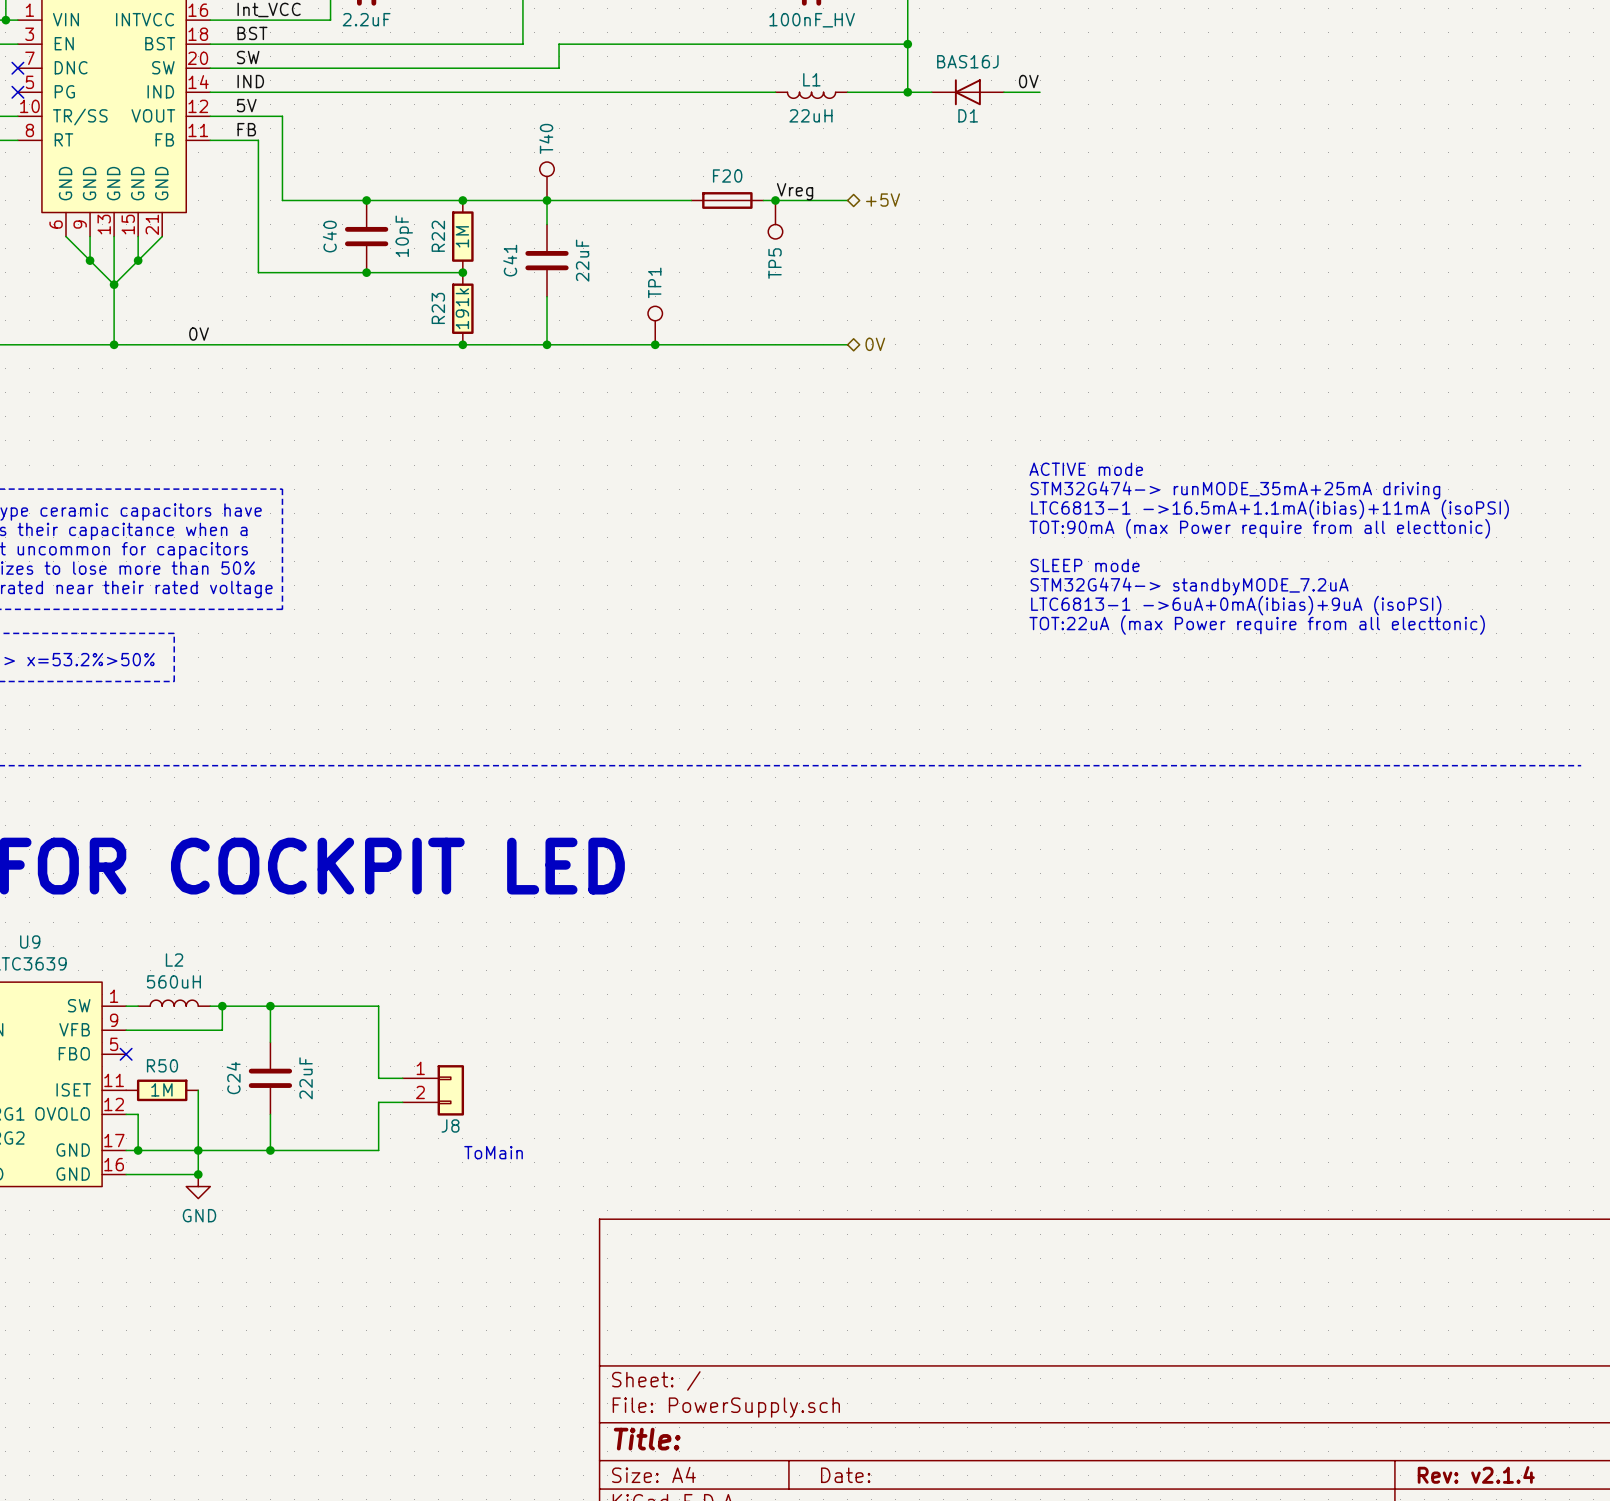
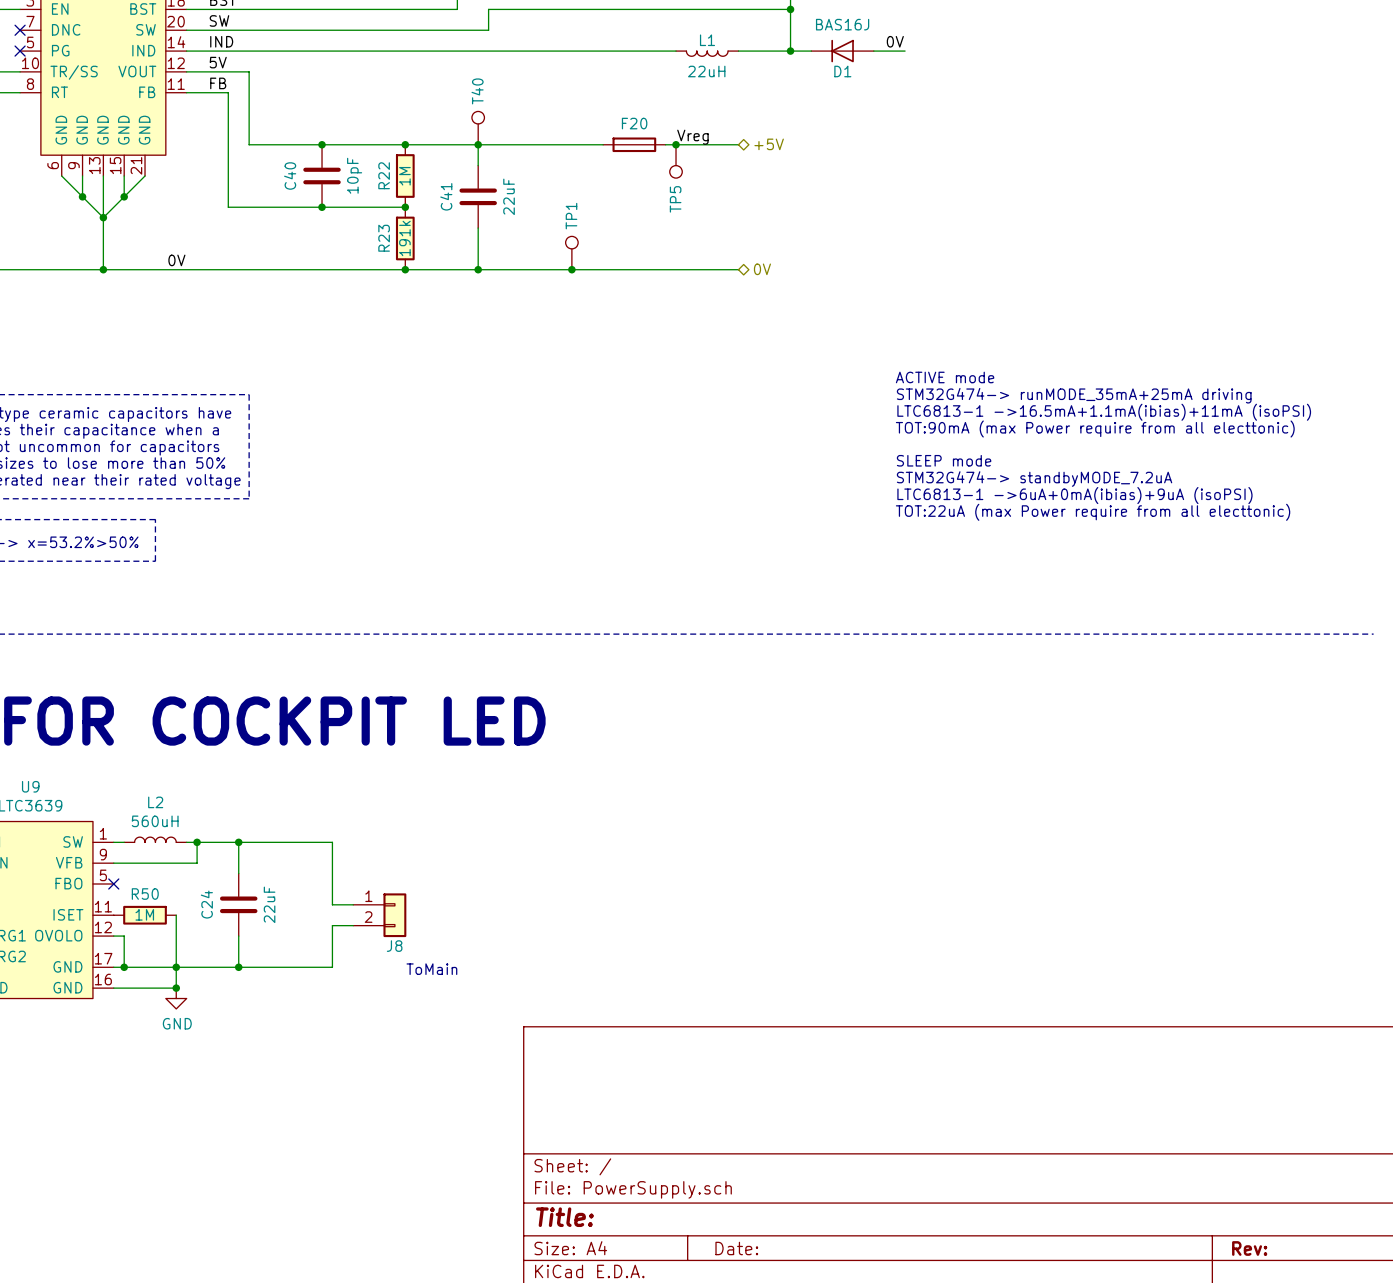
title block: Rev: v2.1.4 (1476, 1474) -> Rev: (1249, 1248)

